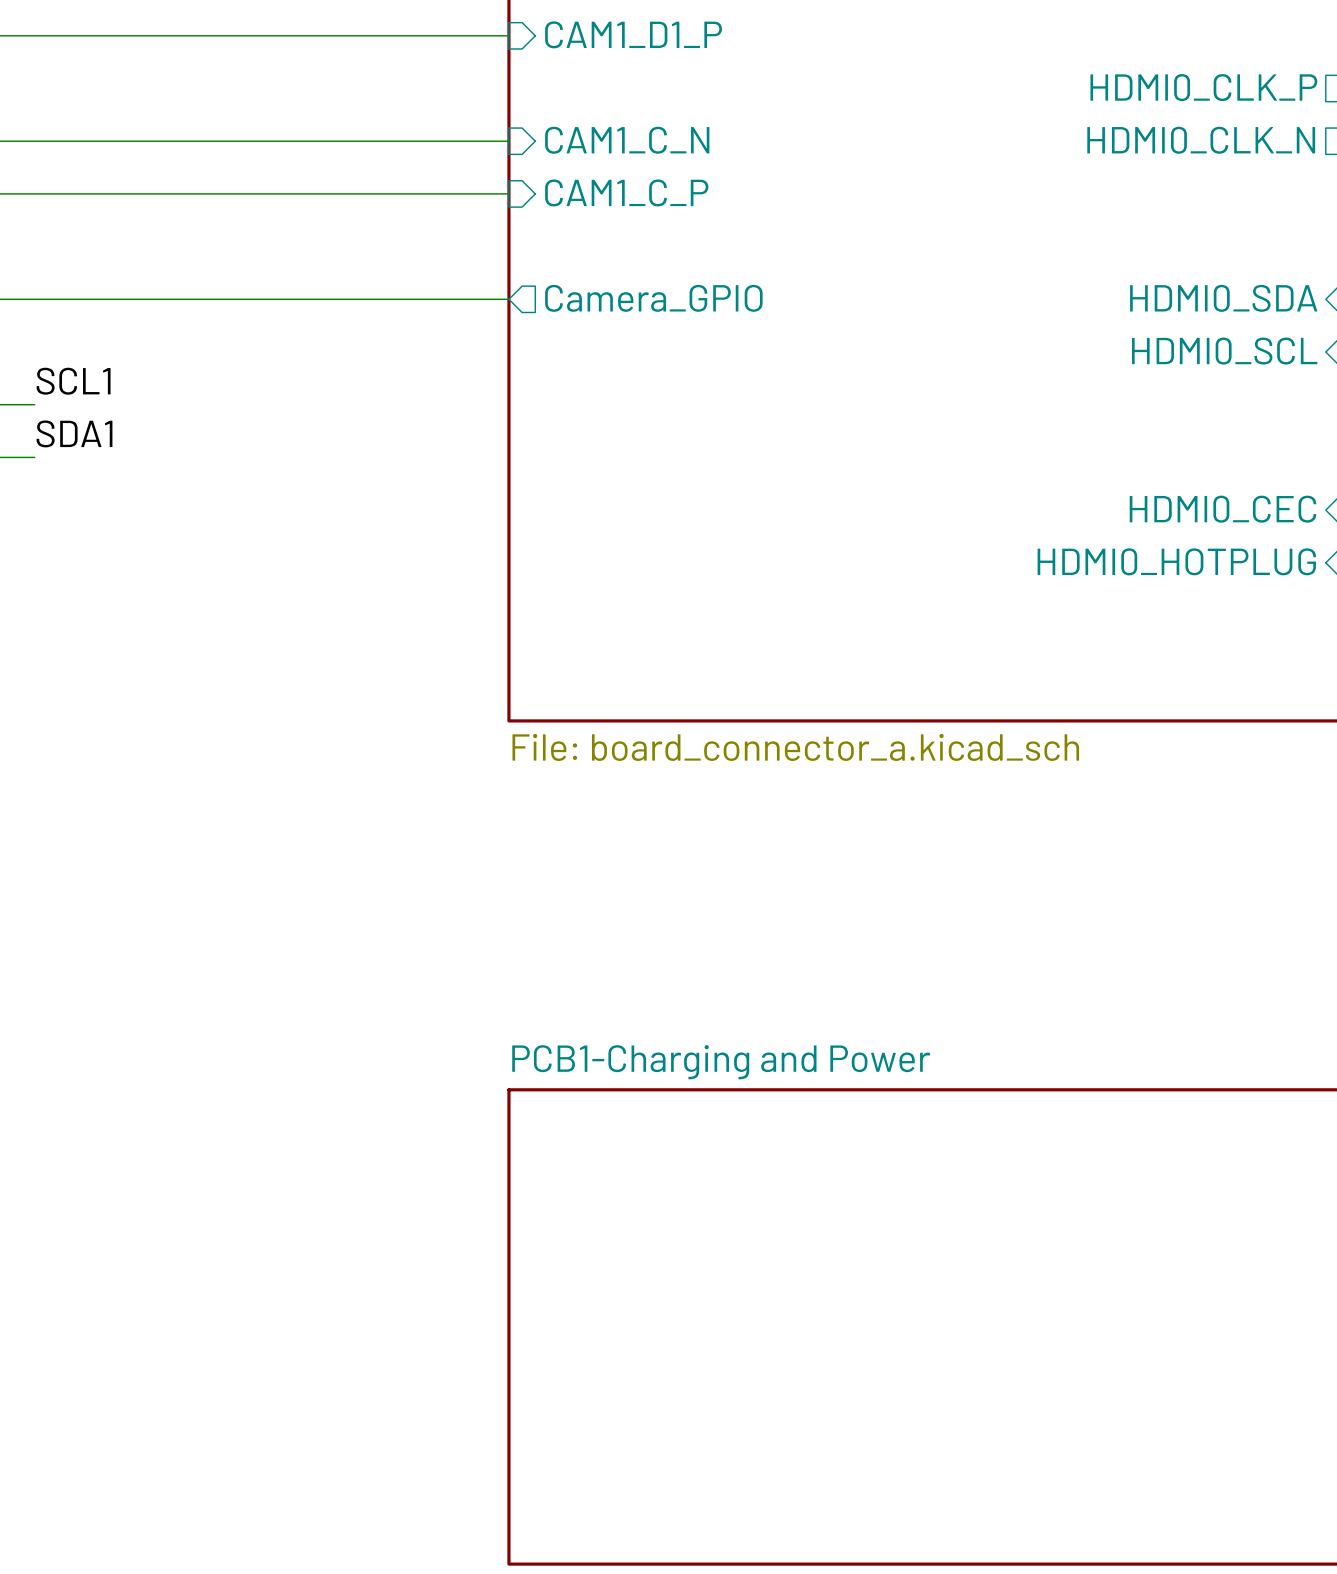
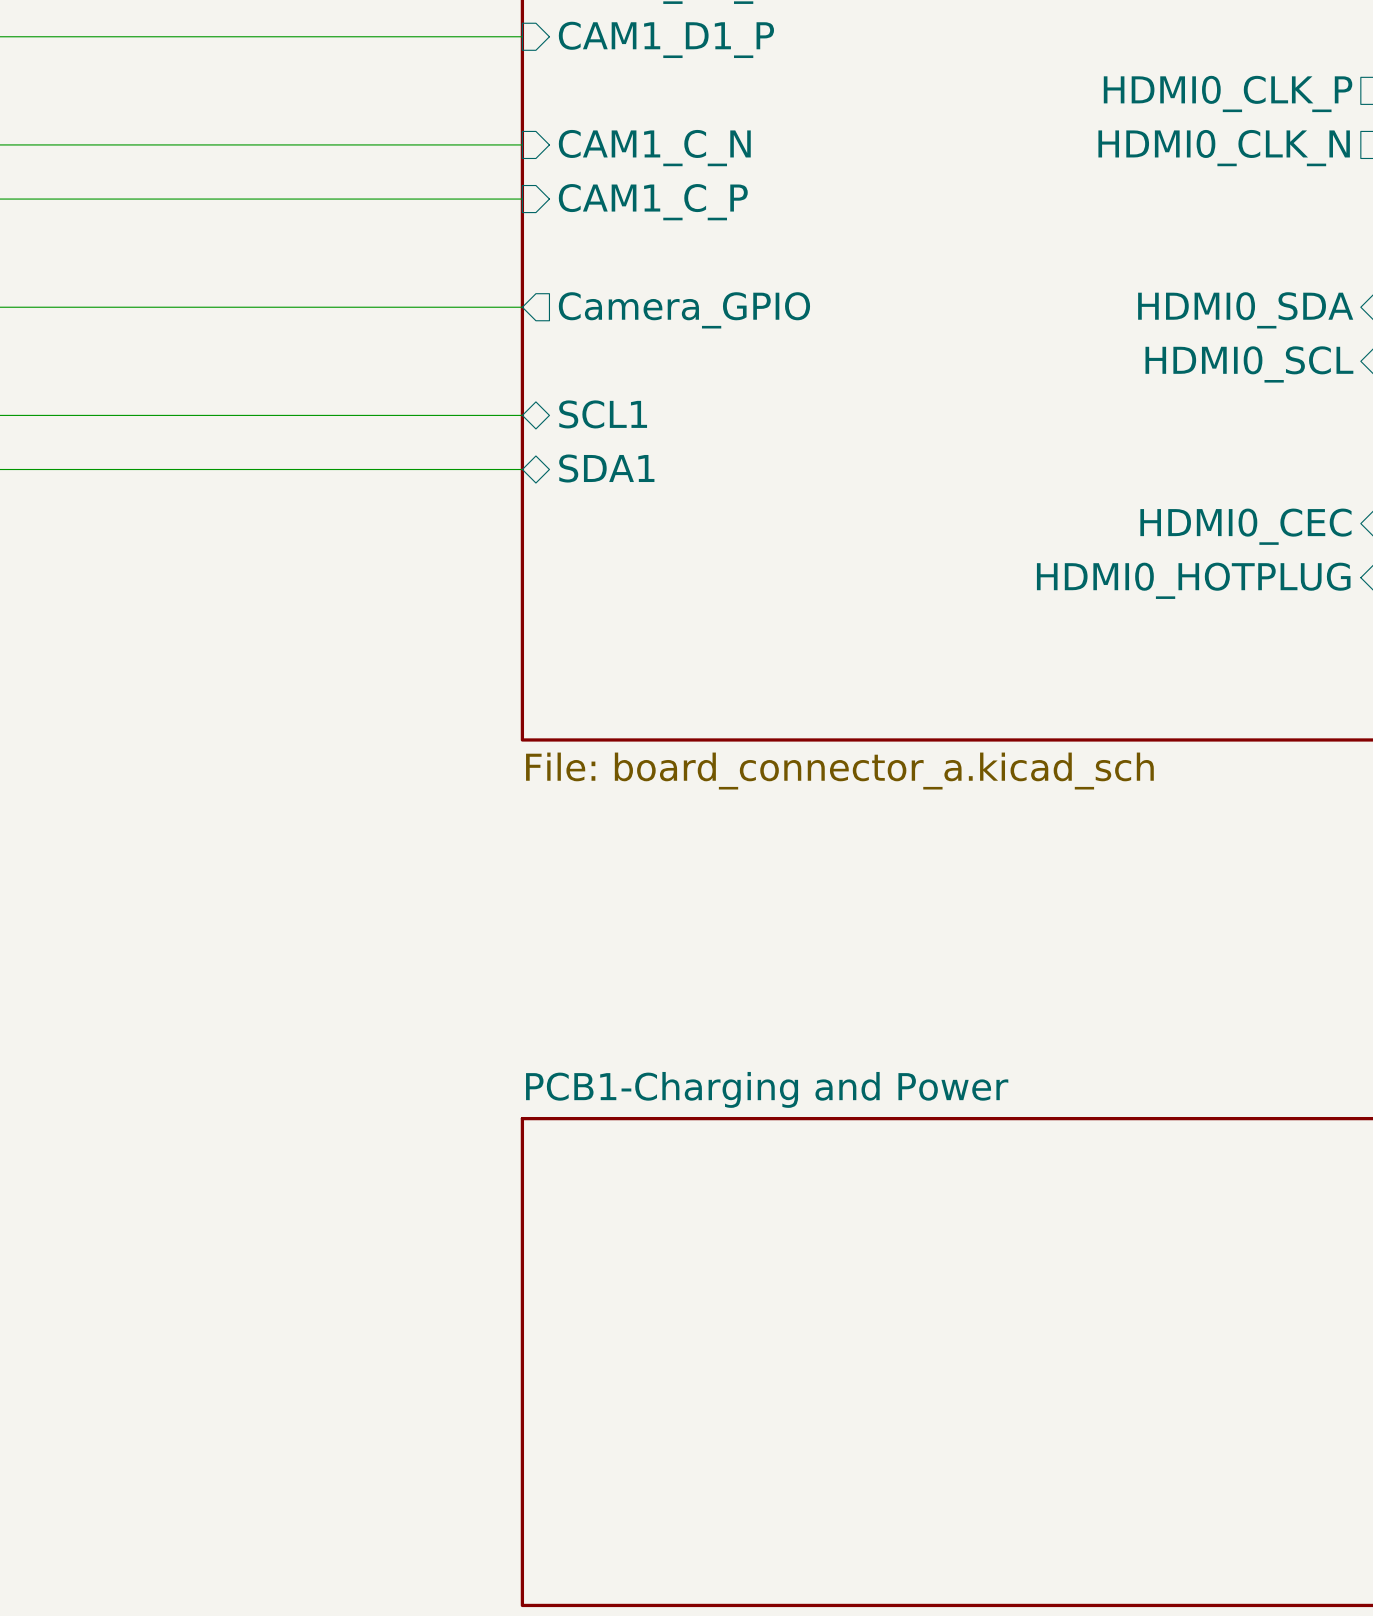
label: SCL1 (73, 381) -> none
sheet pin: none -> SCL1 (603, 414)
wire: none -> (35, 415) (522, 415)
label: SDA1 (74, 433) -> none
sheet pin: none -> SDA1 (606, 468)
wire: none -> (35, 469) (522, 469)

